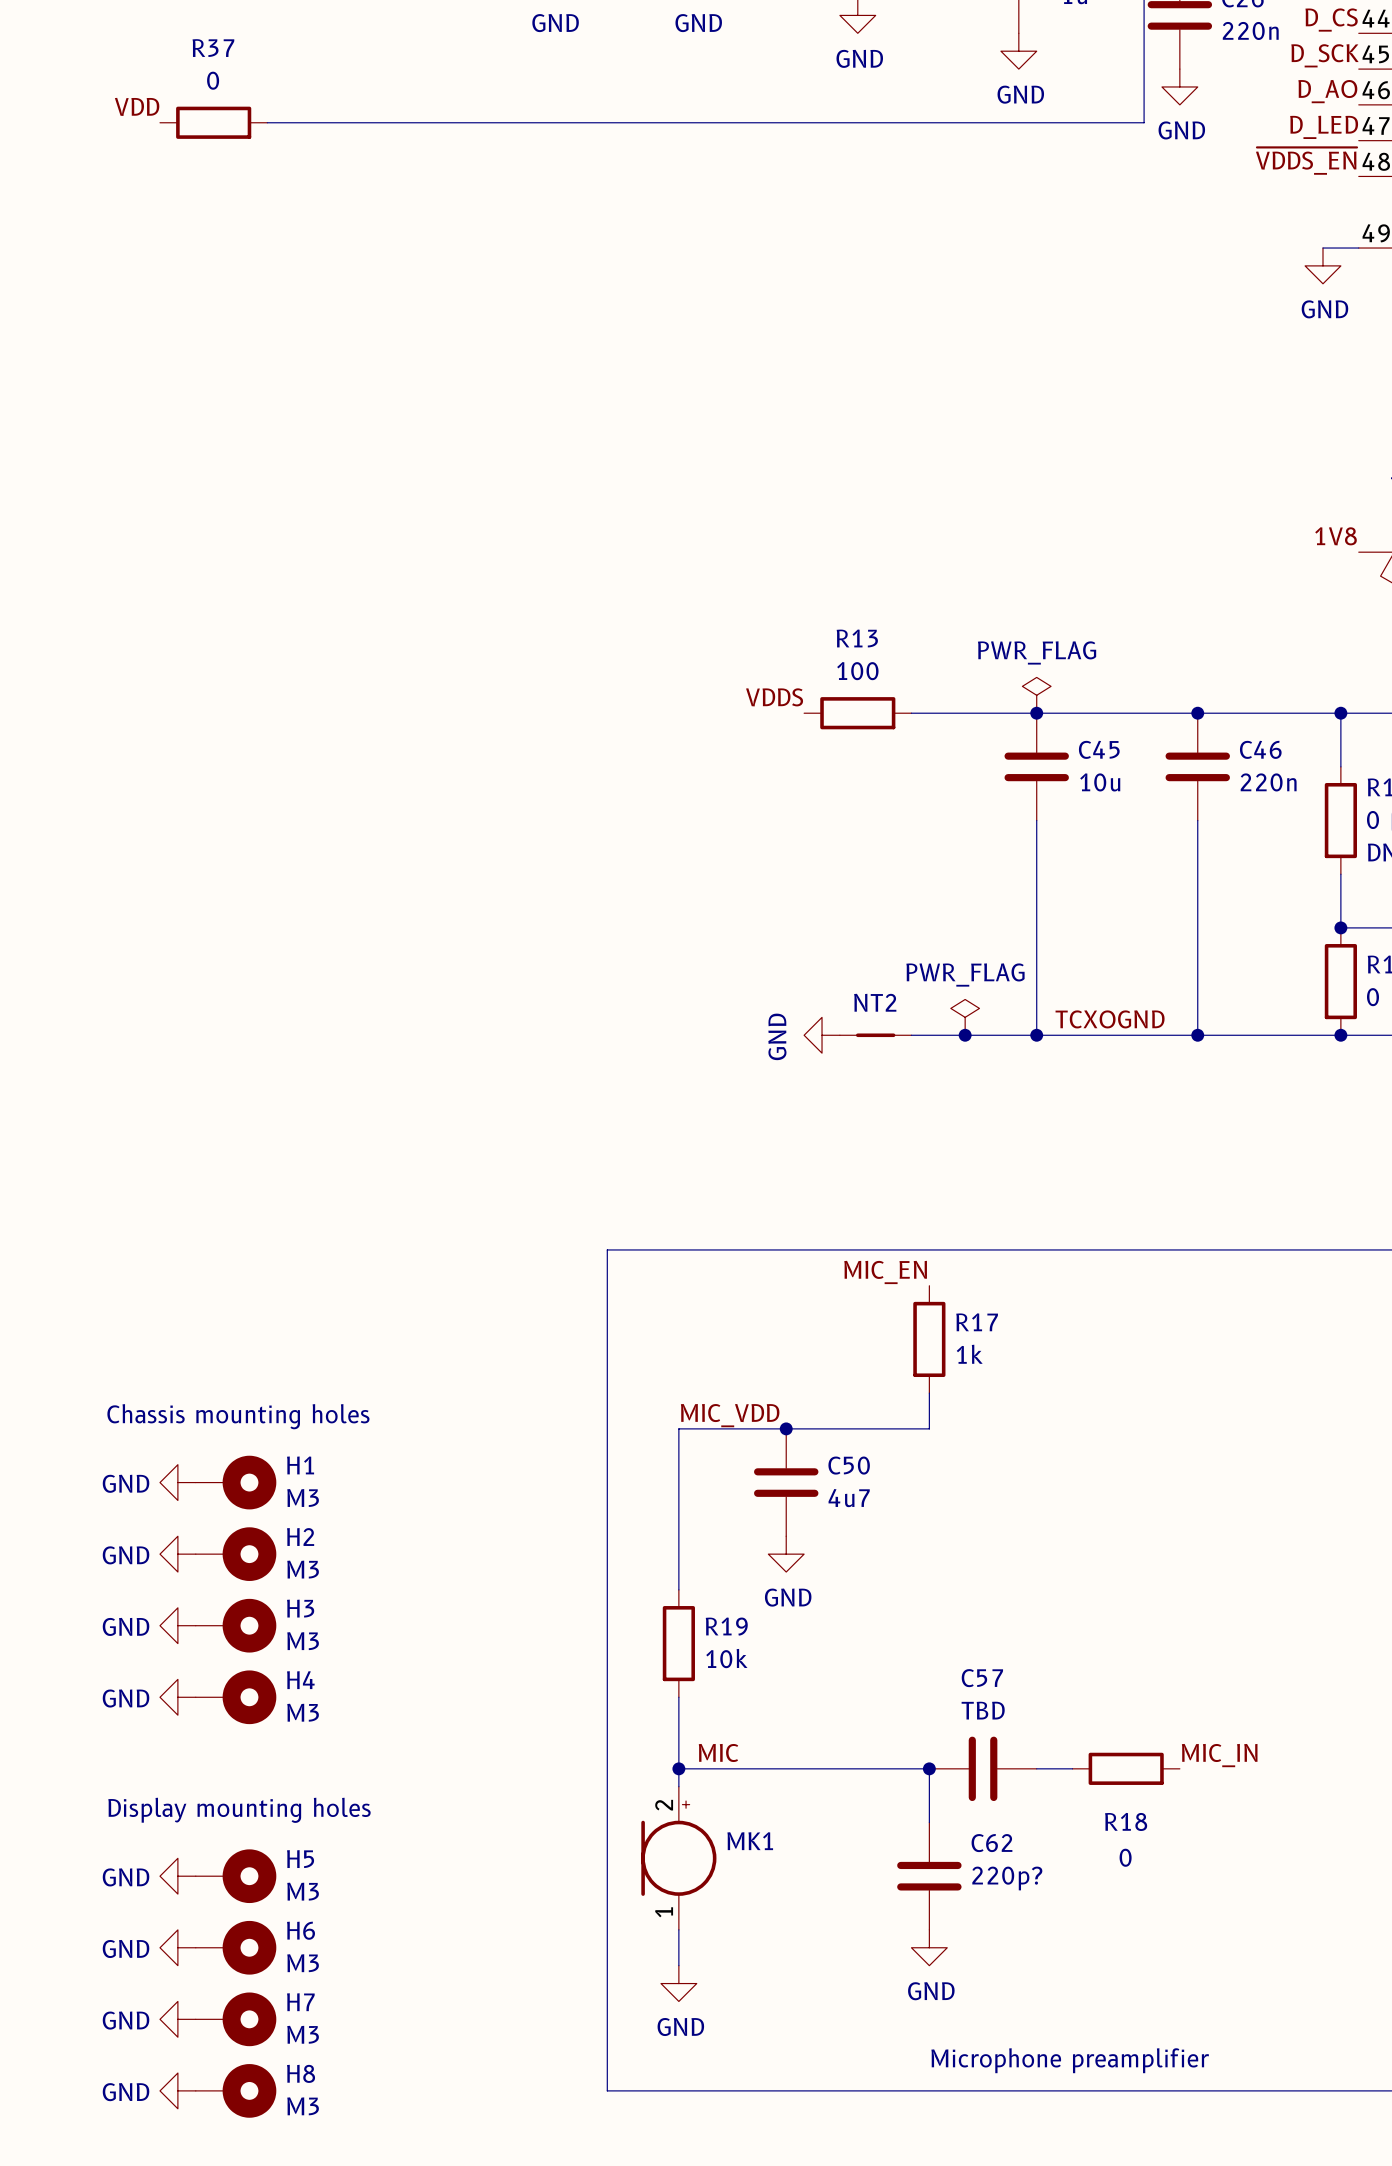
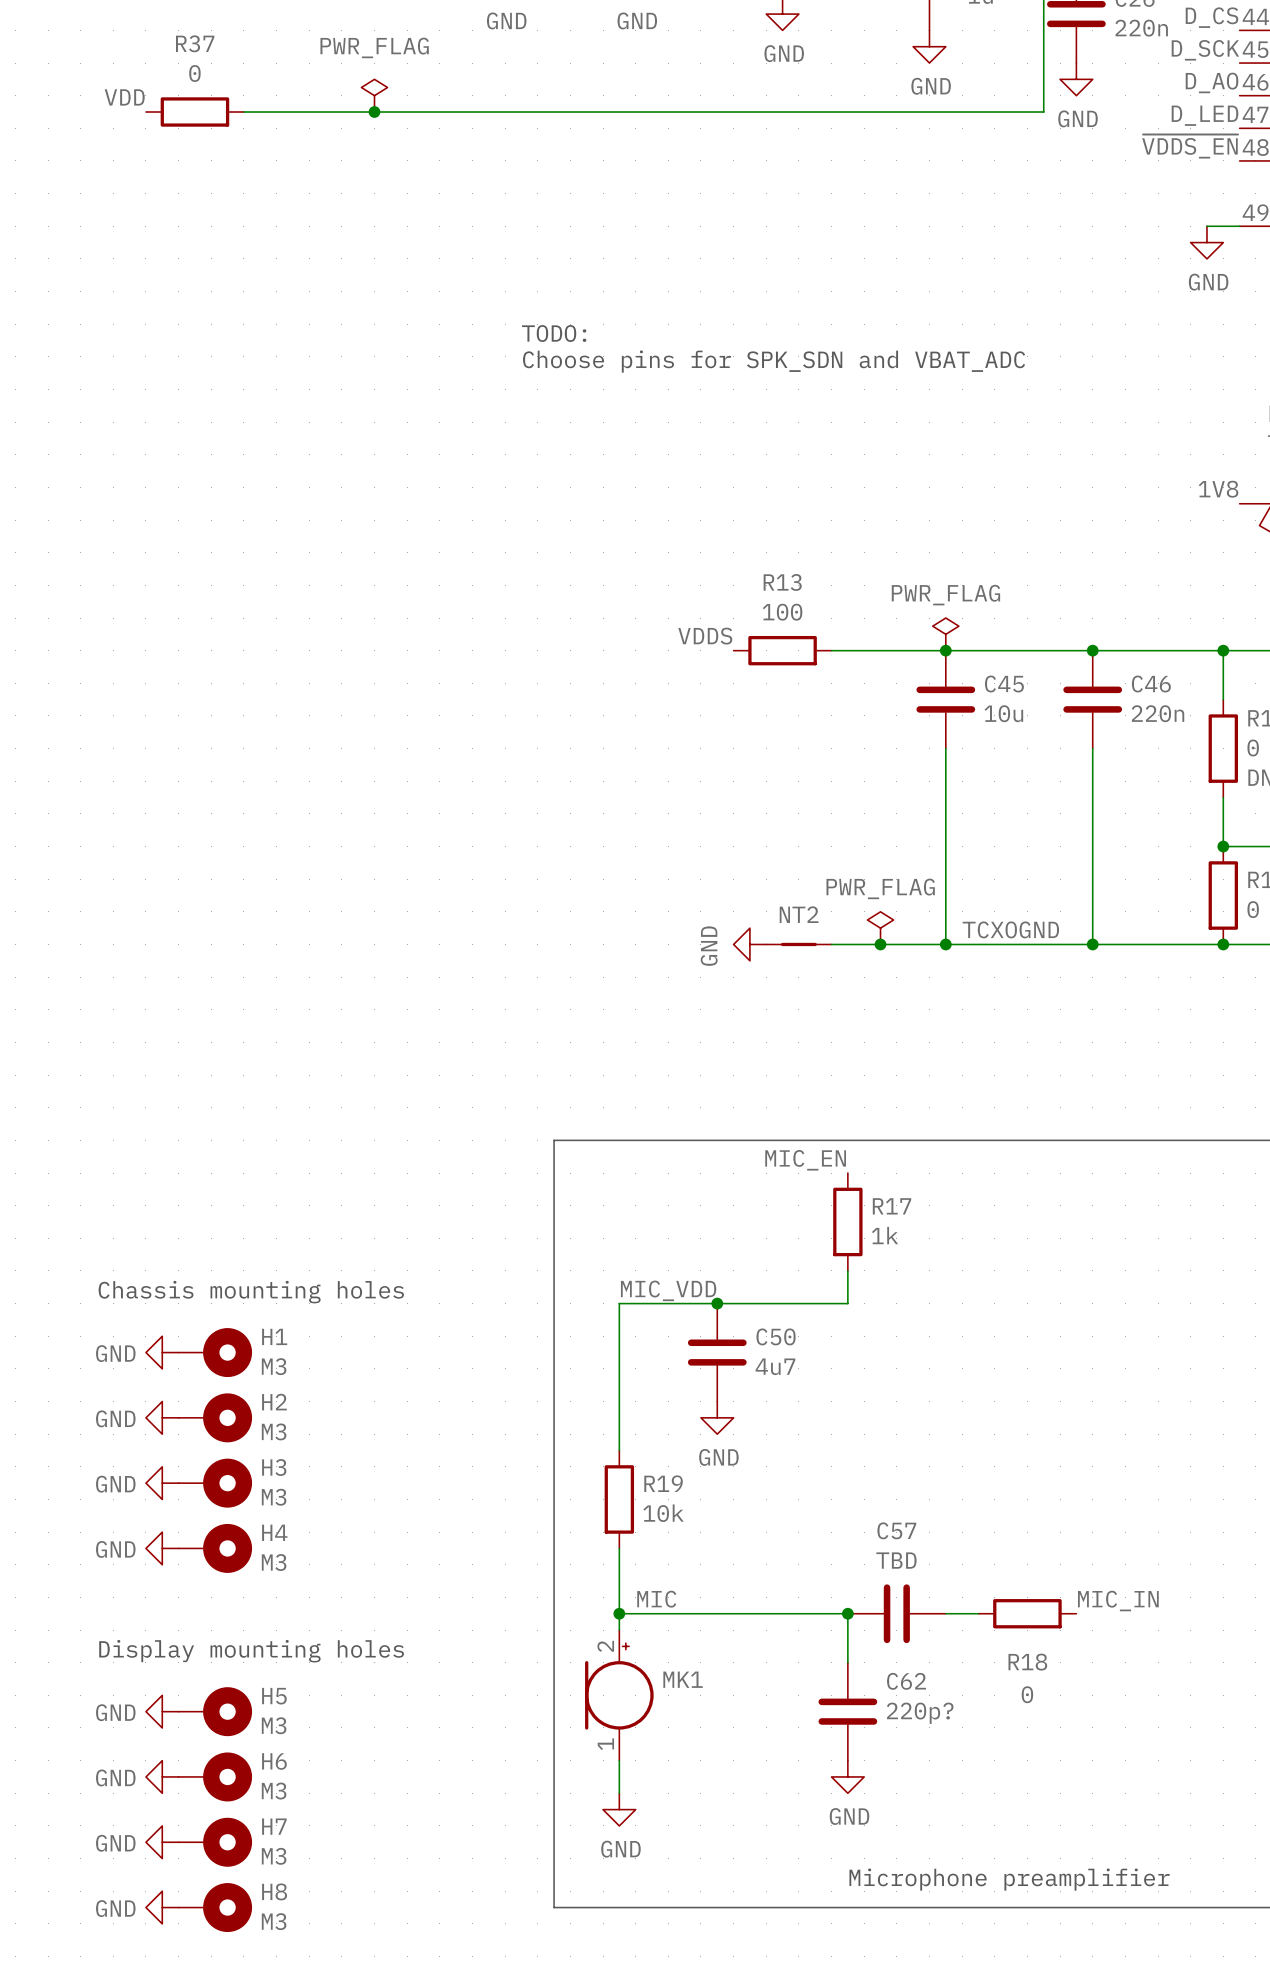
power symbol: none -> PWR_FLAG (374, 95)
junction: none -> (374, 112)
text: none -> TODO: (554, 333)
text: none -> Choose pins for SPK_SDN and VBAT_ADC (774, 361)

